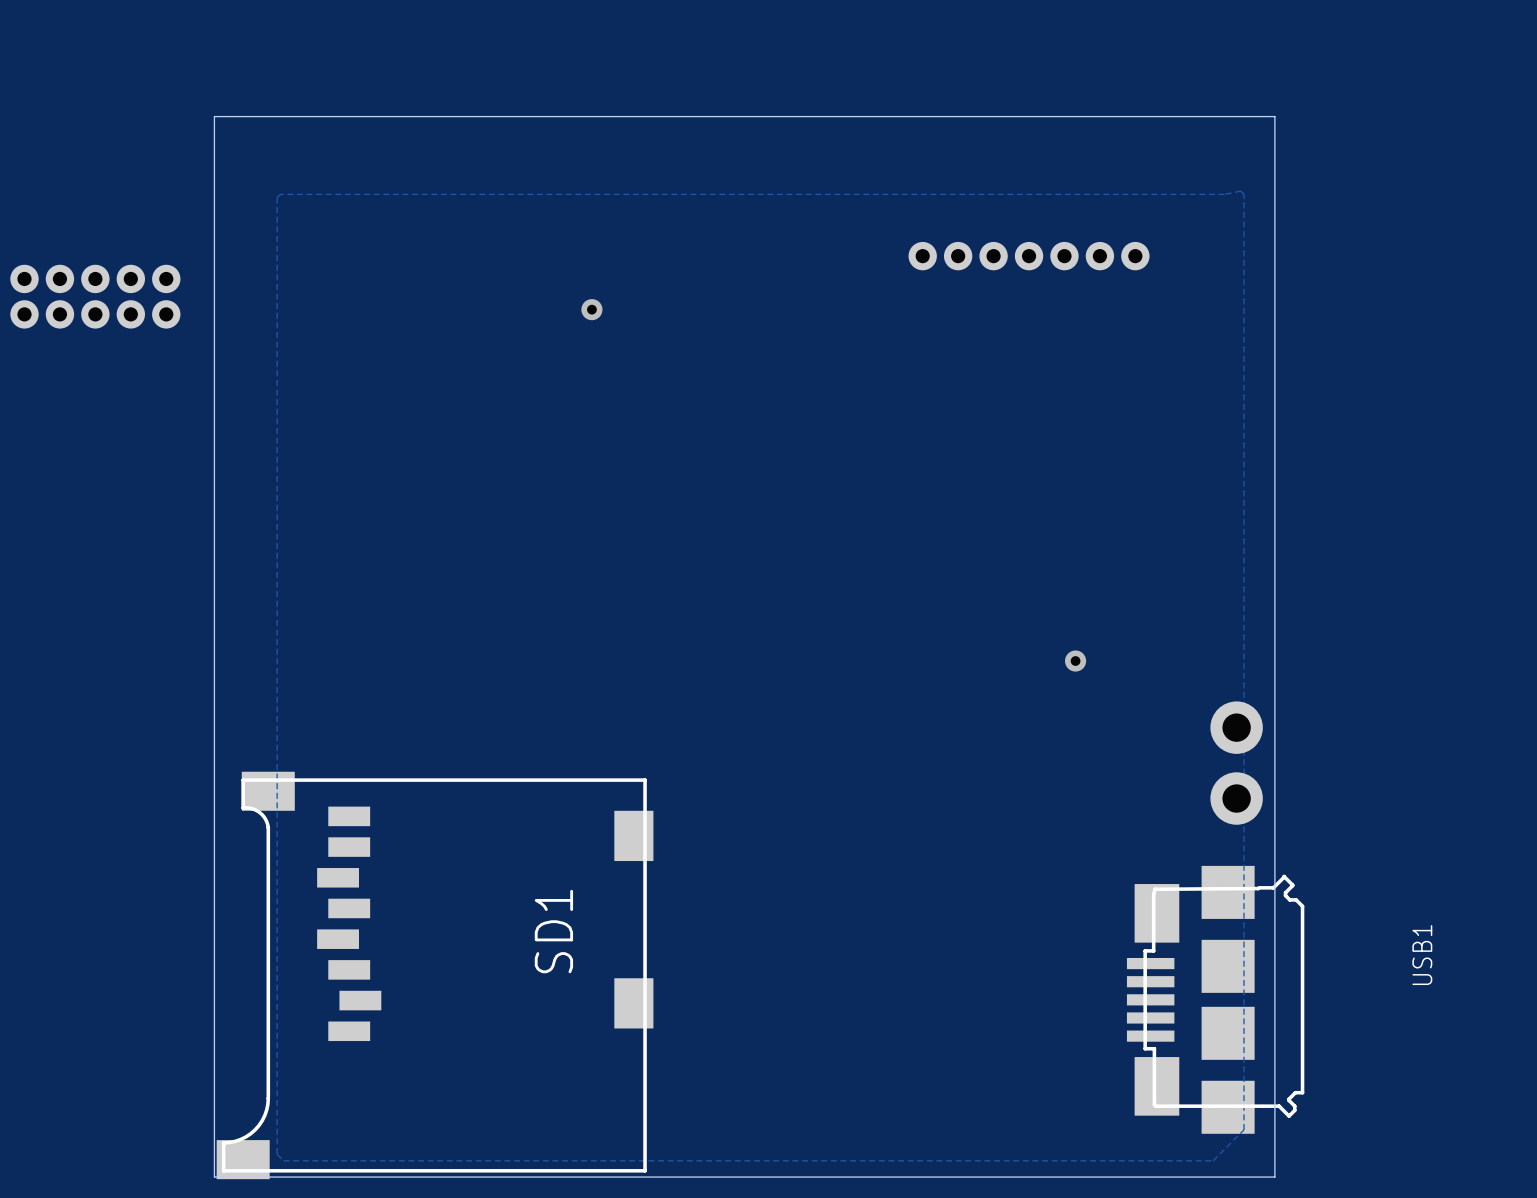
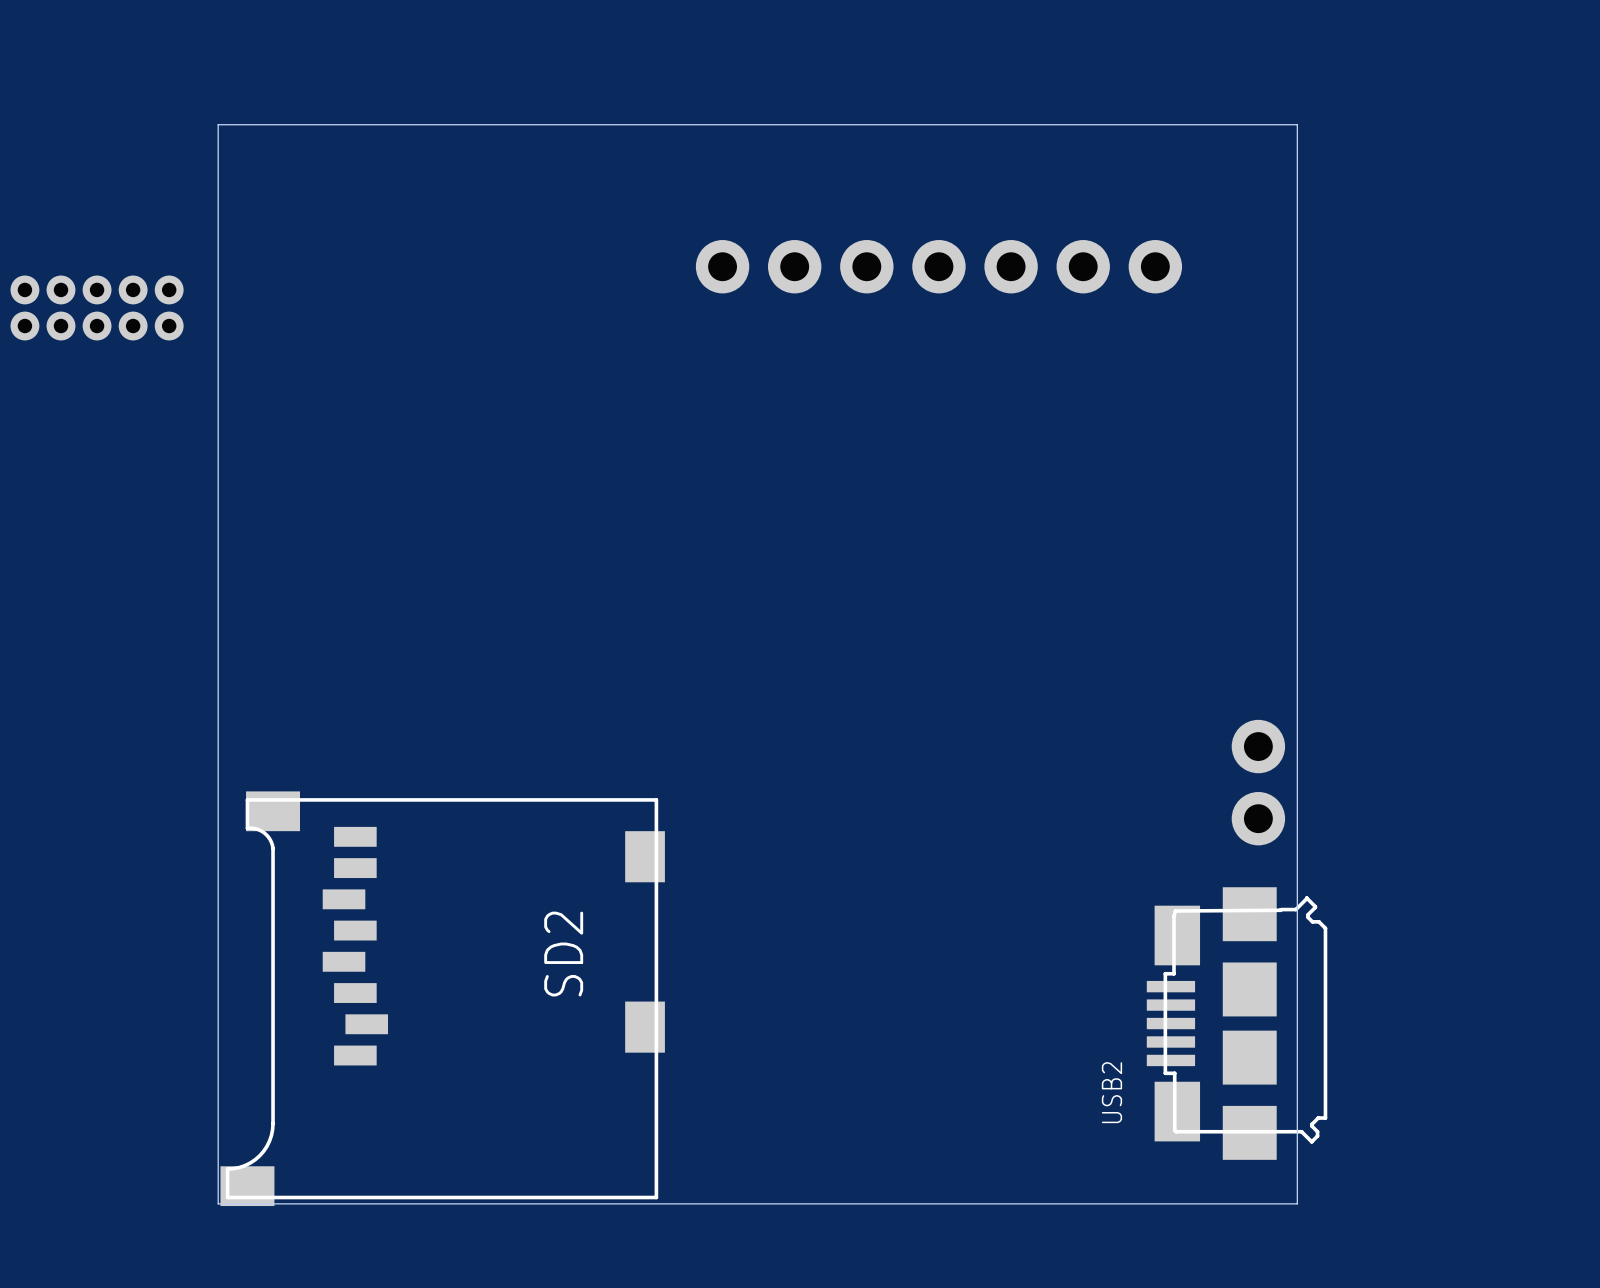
zone outline: (1240, 191) (1243, 194) (1243, 1129) (1213, 1160) (283, 1160) (277, 1154) (277, 197) (280, 194) (1224, 194) (1240, 191) -> none
part: none -> (938, 266)
part: (1029, 256) -> none
via: (591, 309) -> none
via: (1075, 661) -> none
SD1 name: SD1 (553, 931) -> SD2 (563, 954)
USB1 name: USB1 (1422, 955) -> USB2 (1111, 1092)

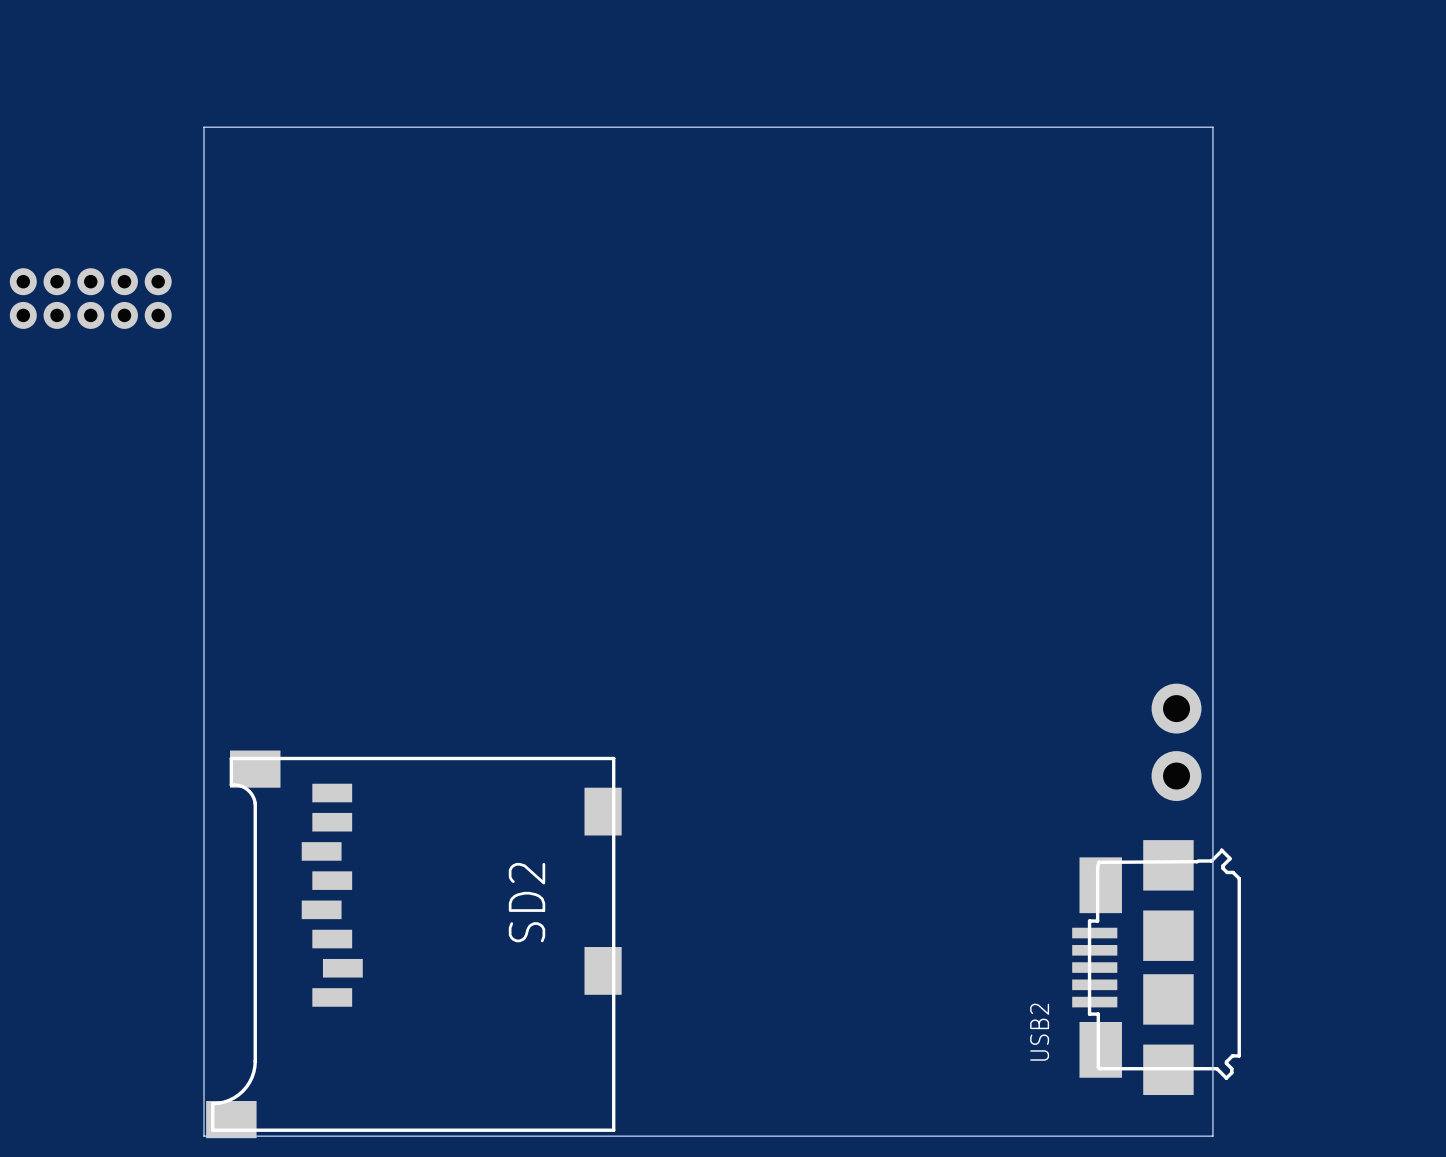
part: (938, 266) -> none

